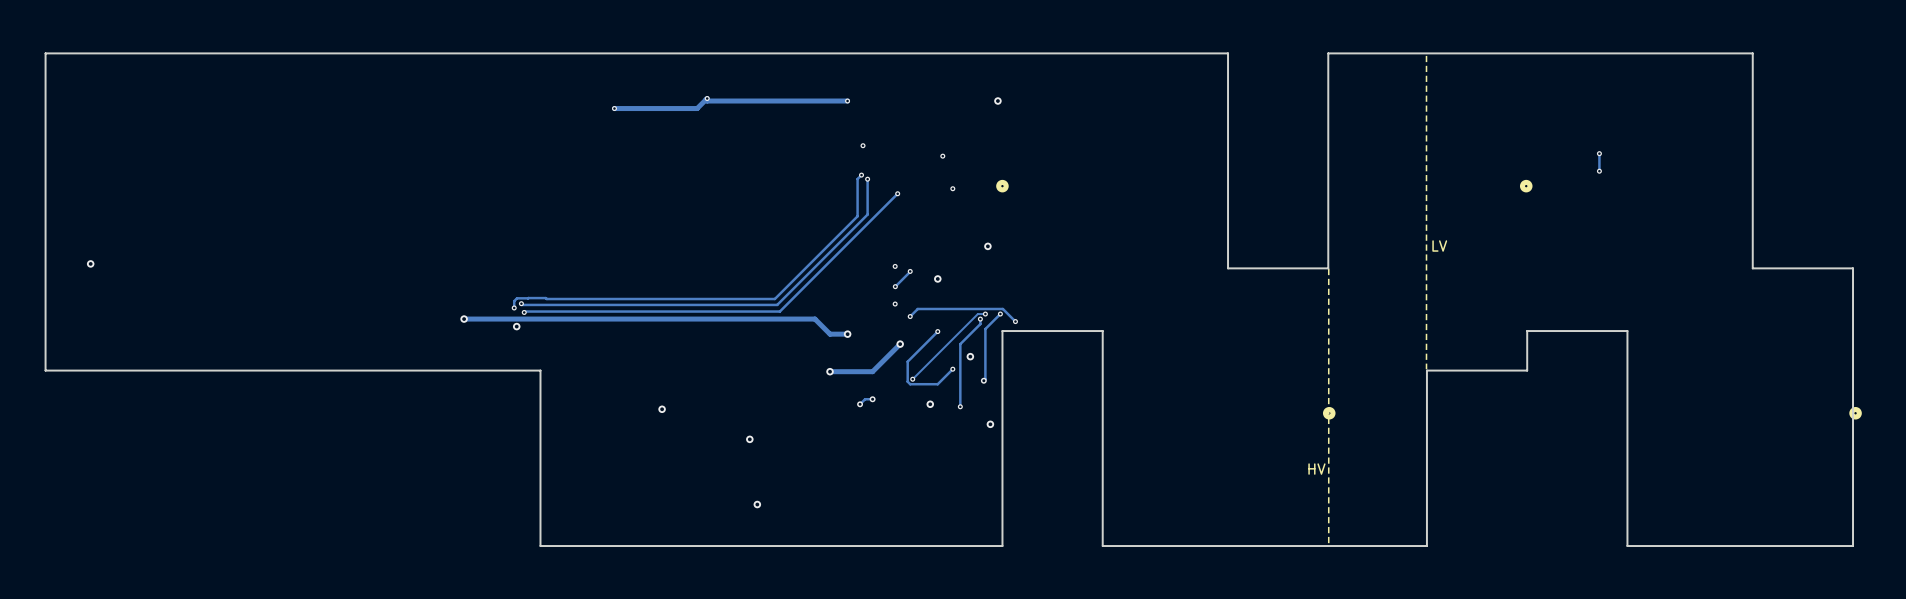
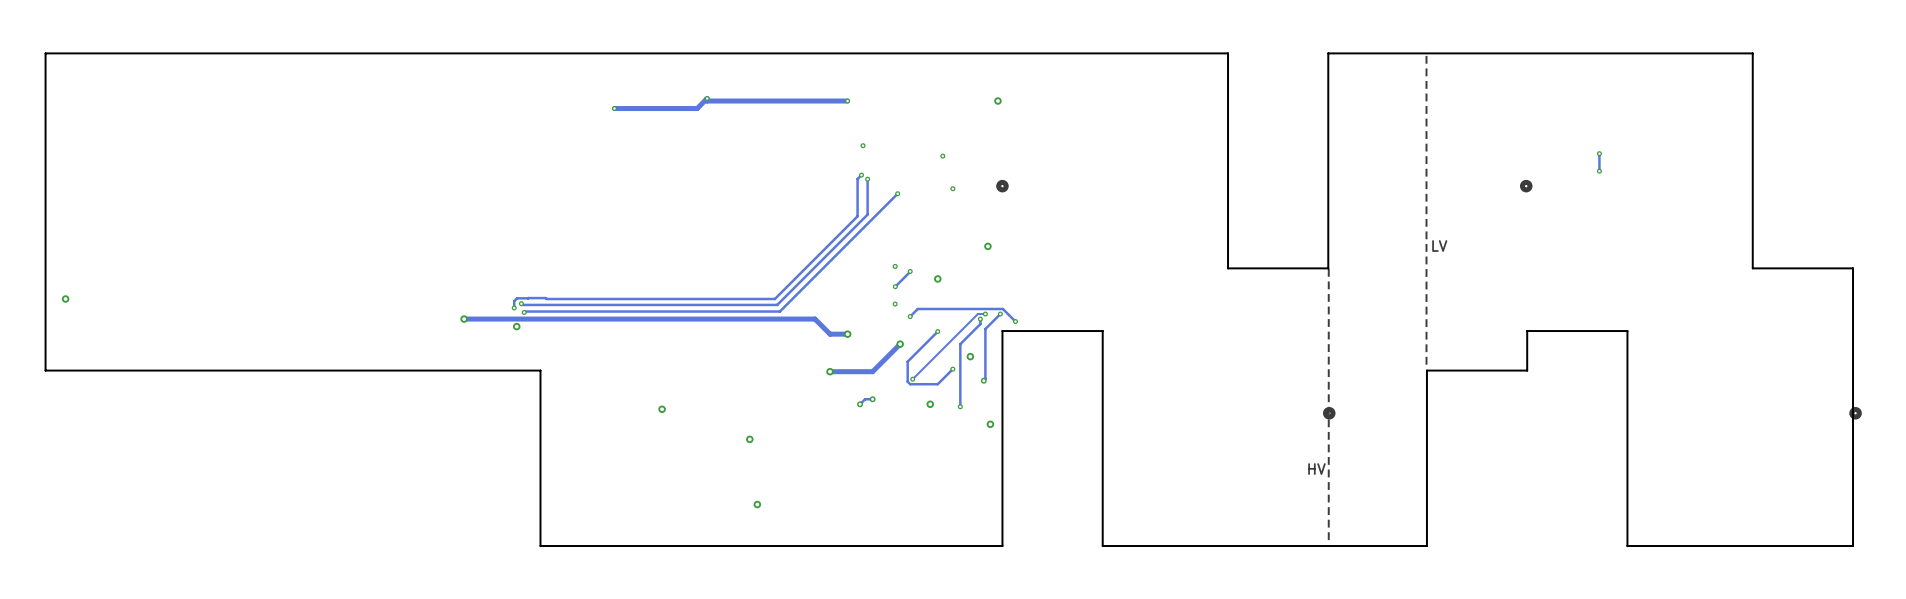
via position: (90, 263) -> (65, 299)

